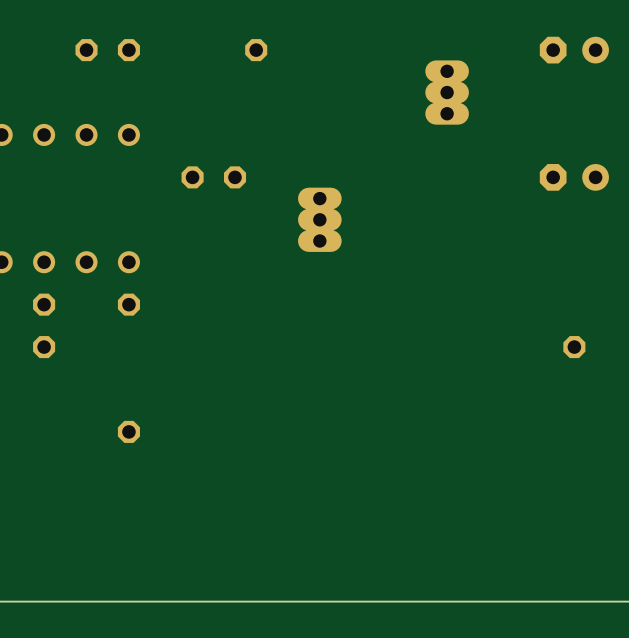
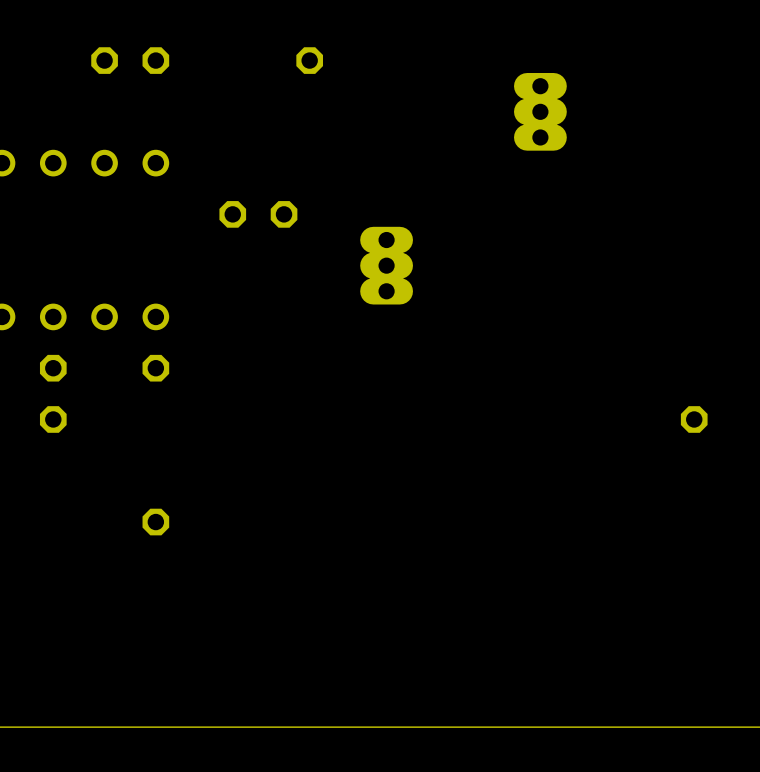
part: (574, 50) -> none
part: (574, 177) -> none

